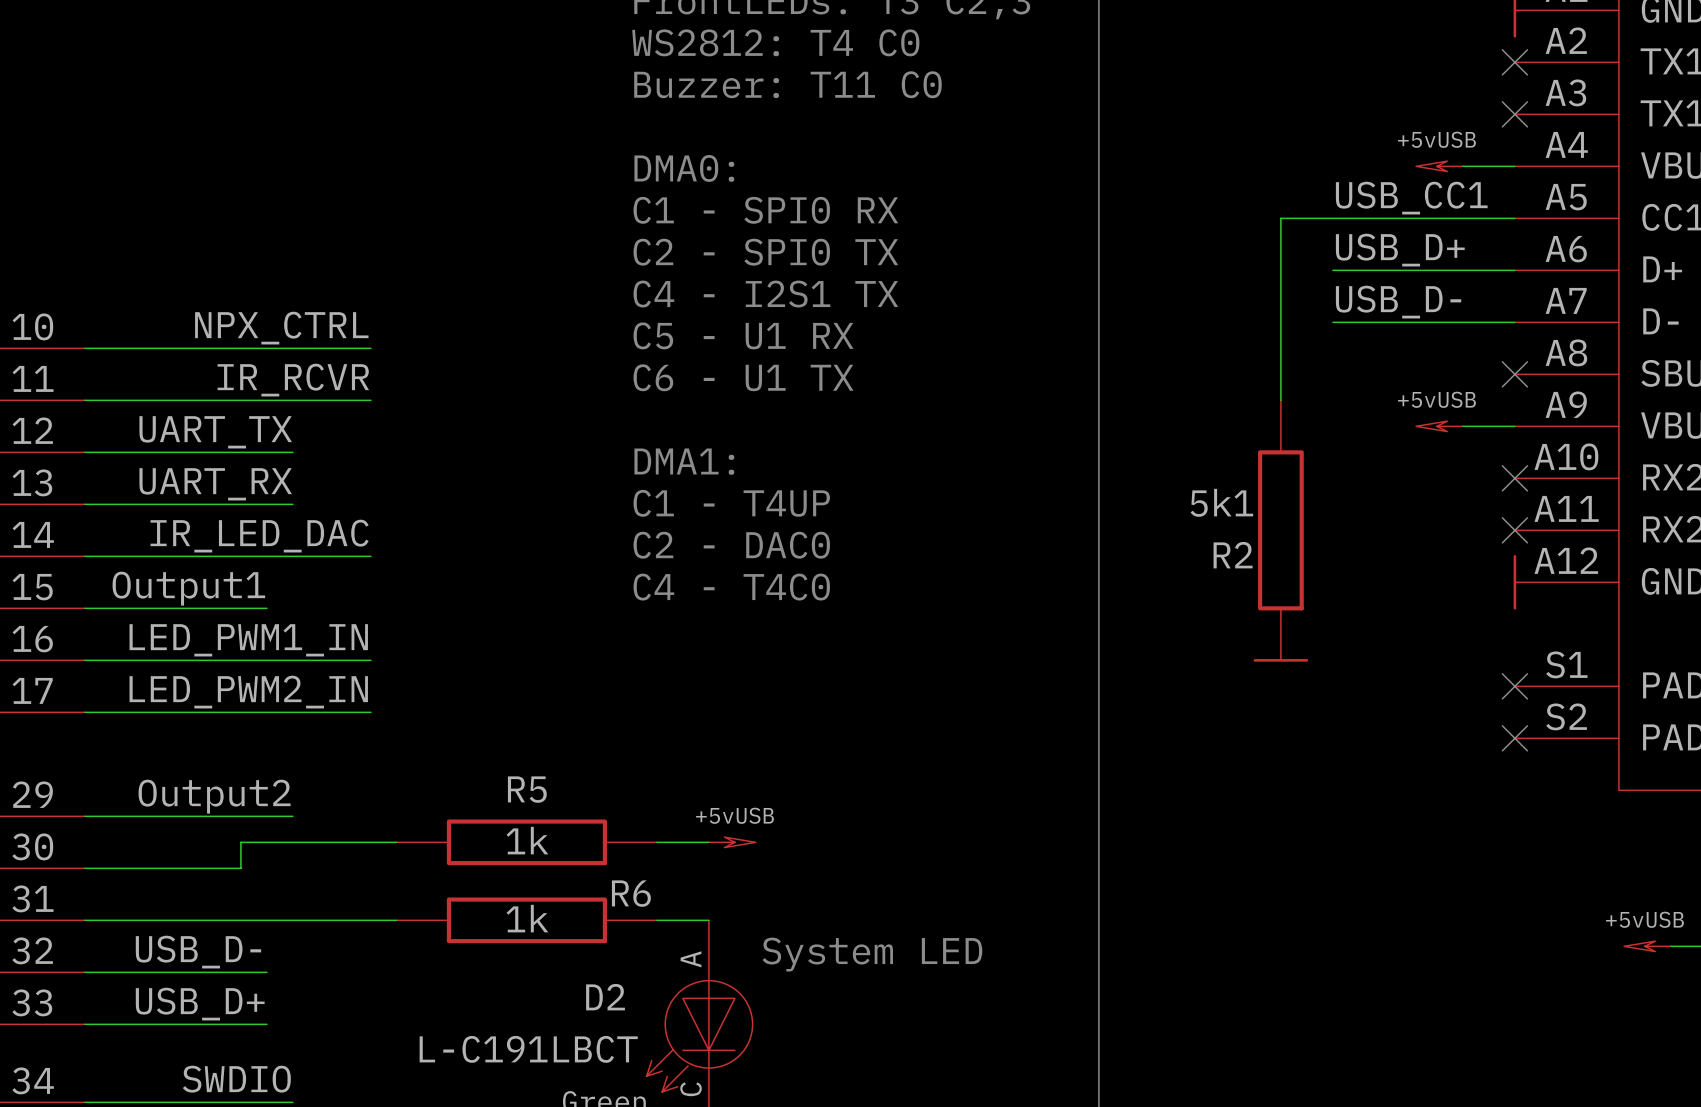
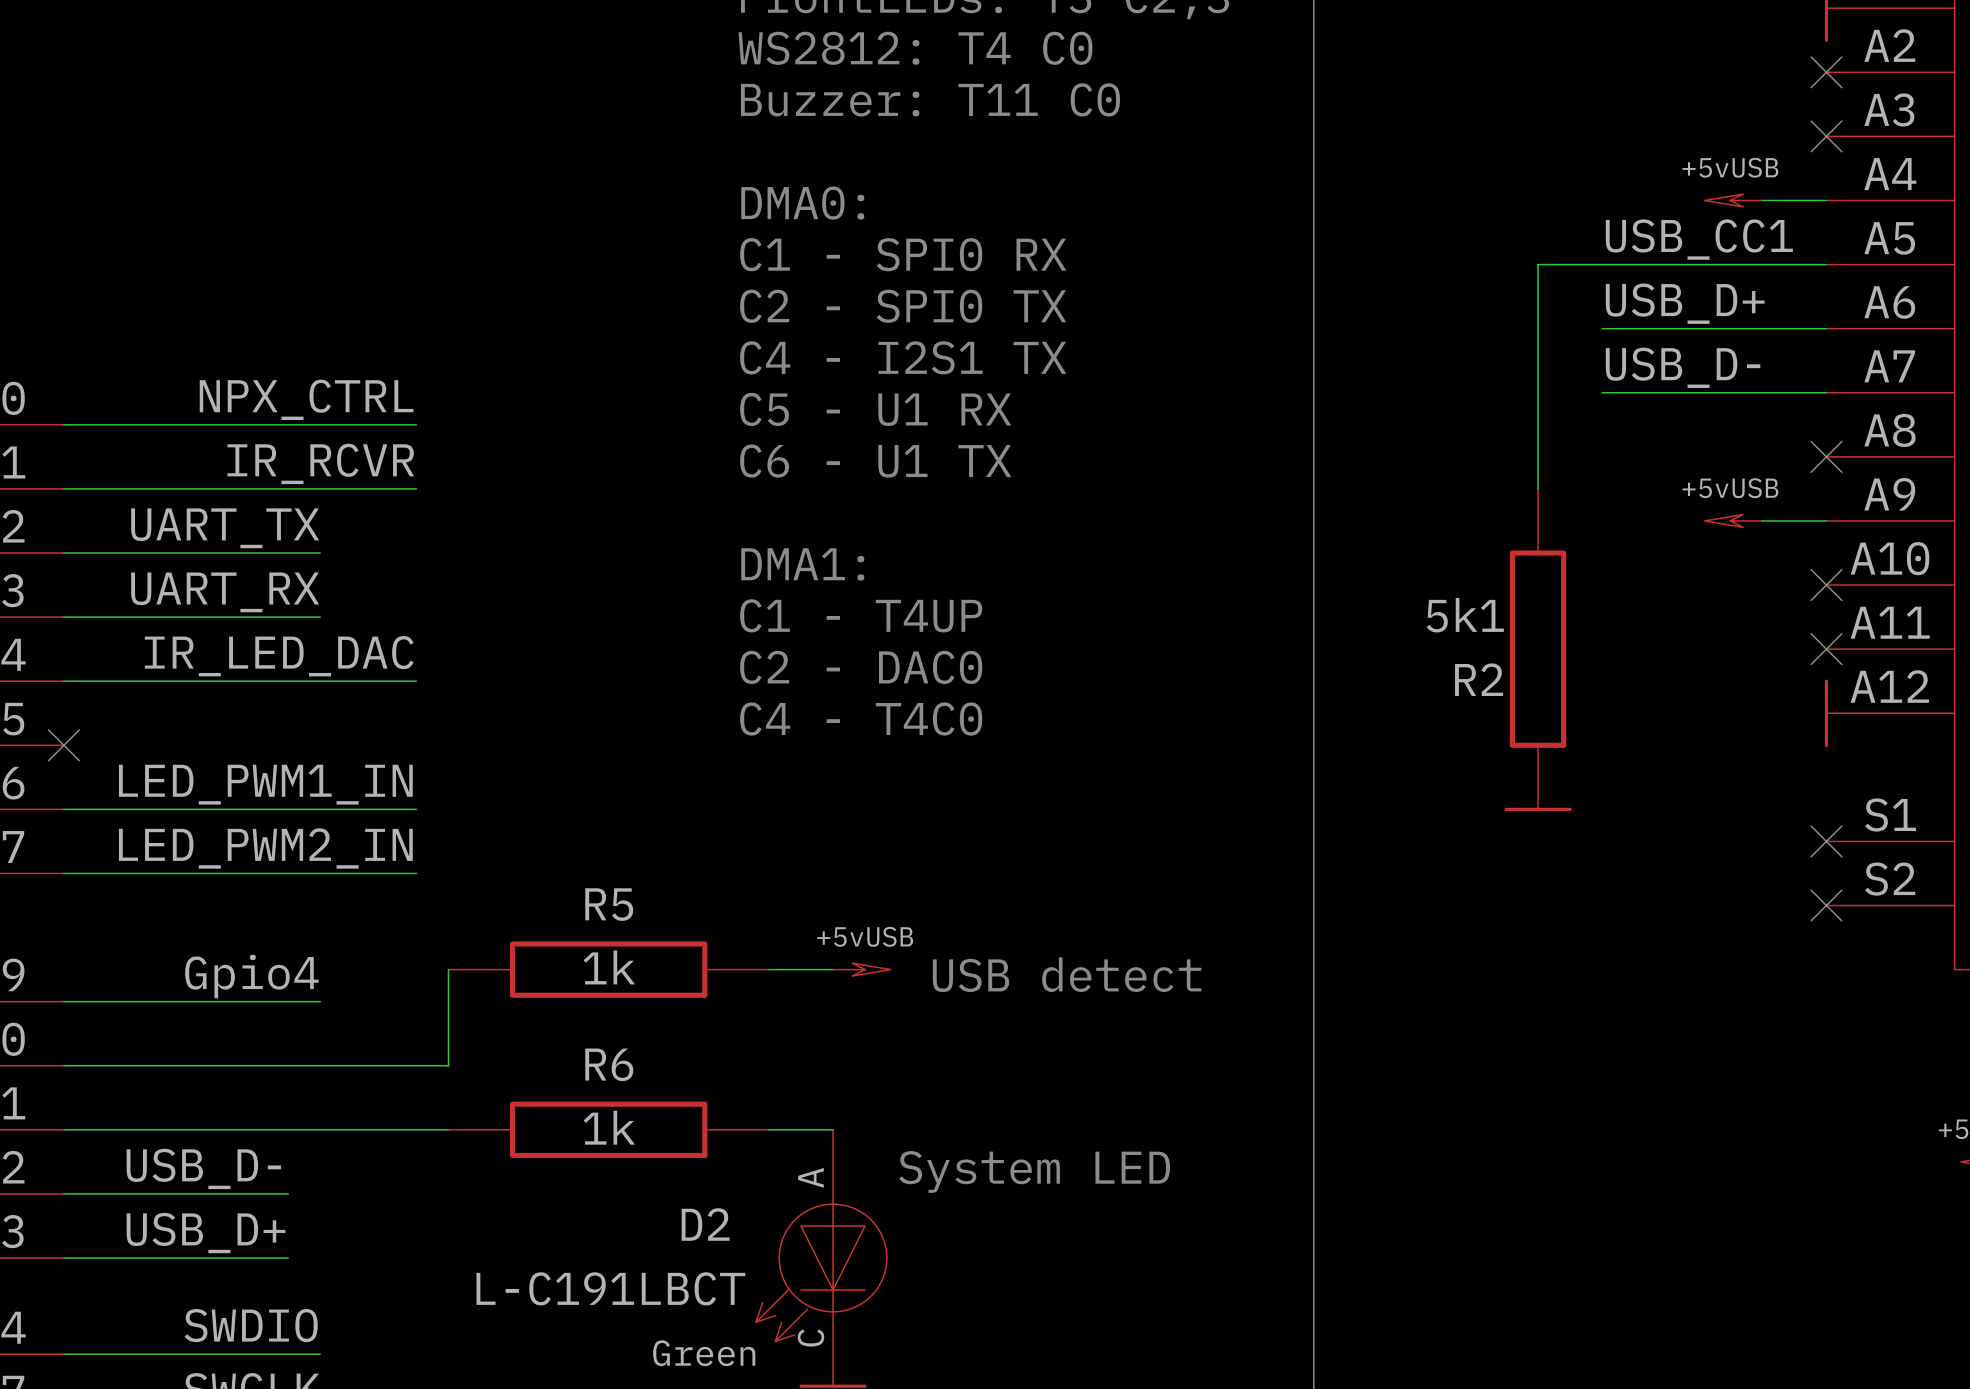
label: Output1 (188, 588) -> none
wire: (84, 608) (266, 608) -> none
no-connect mark: none -> (63, 745)
text: none -> USB detect (1067, 974)
label: Output2 (214, 796) -> Gpio4 (251, 976)
wire: (396, 842) (240, 842) (240, 868) -> (448, 969) (448, 1065) (256, 1065)
R5 position: (526, 842) -> (608, 969)
wire: (656, 842) (708, 842) -> (768, 969) (833, 969)
power symbol position: +5vUSB (732, 842) -> +5vUSB (861, 969)
R6 name position: R6 (631, 893) -> R6 (609, 1064)

